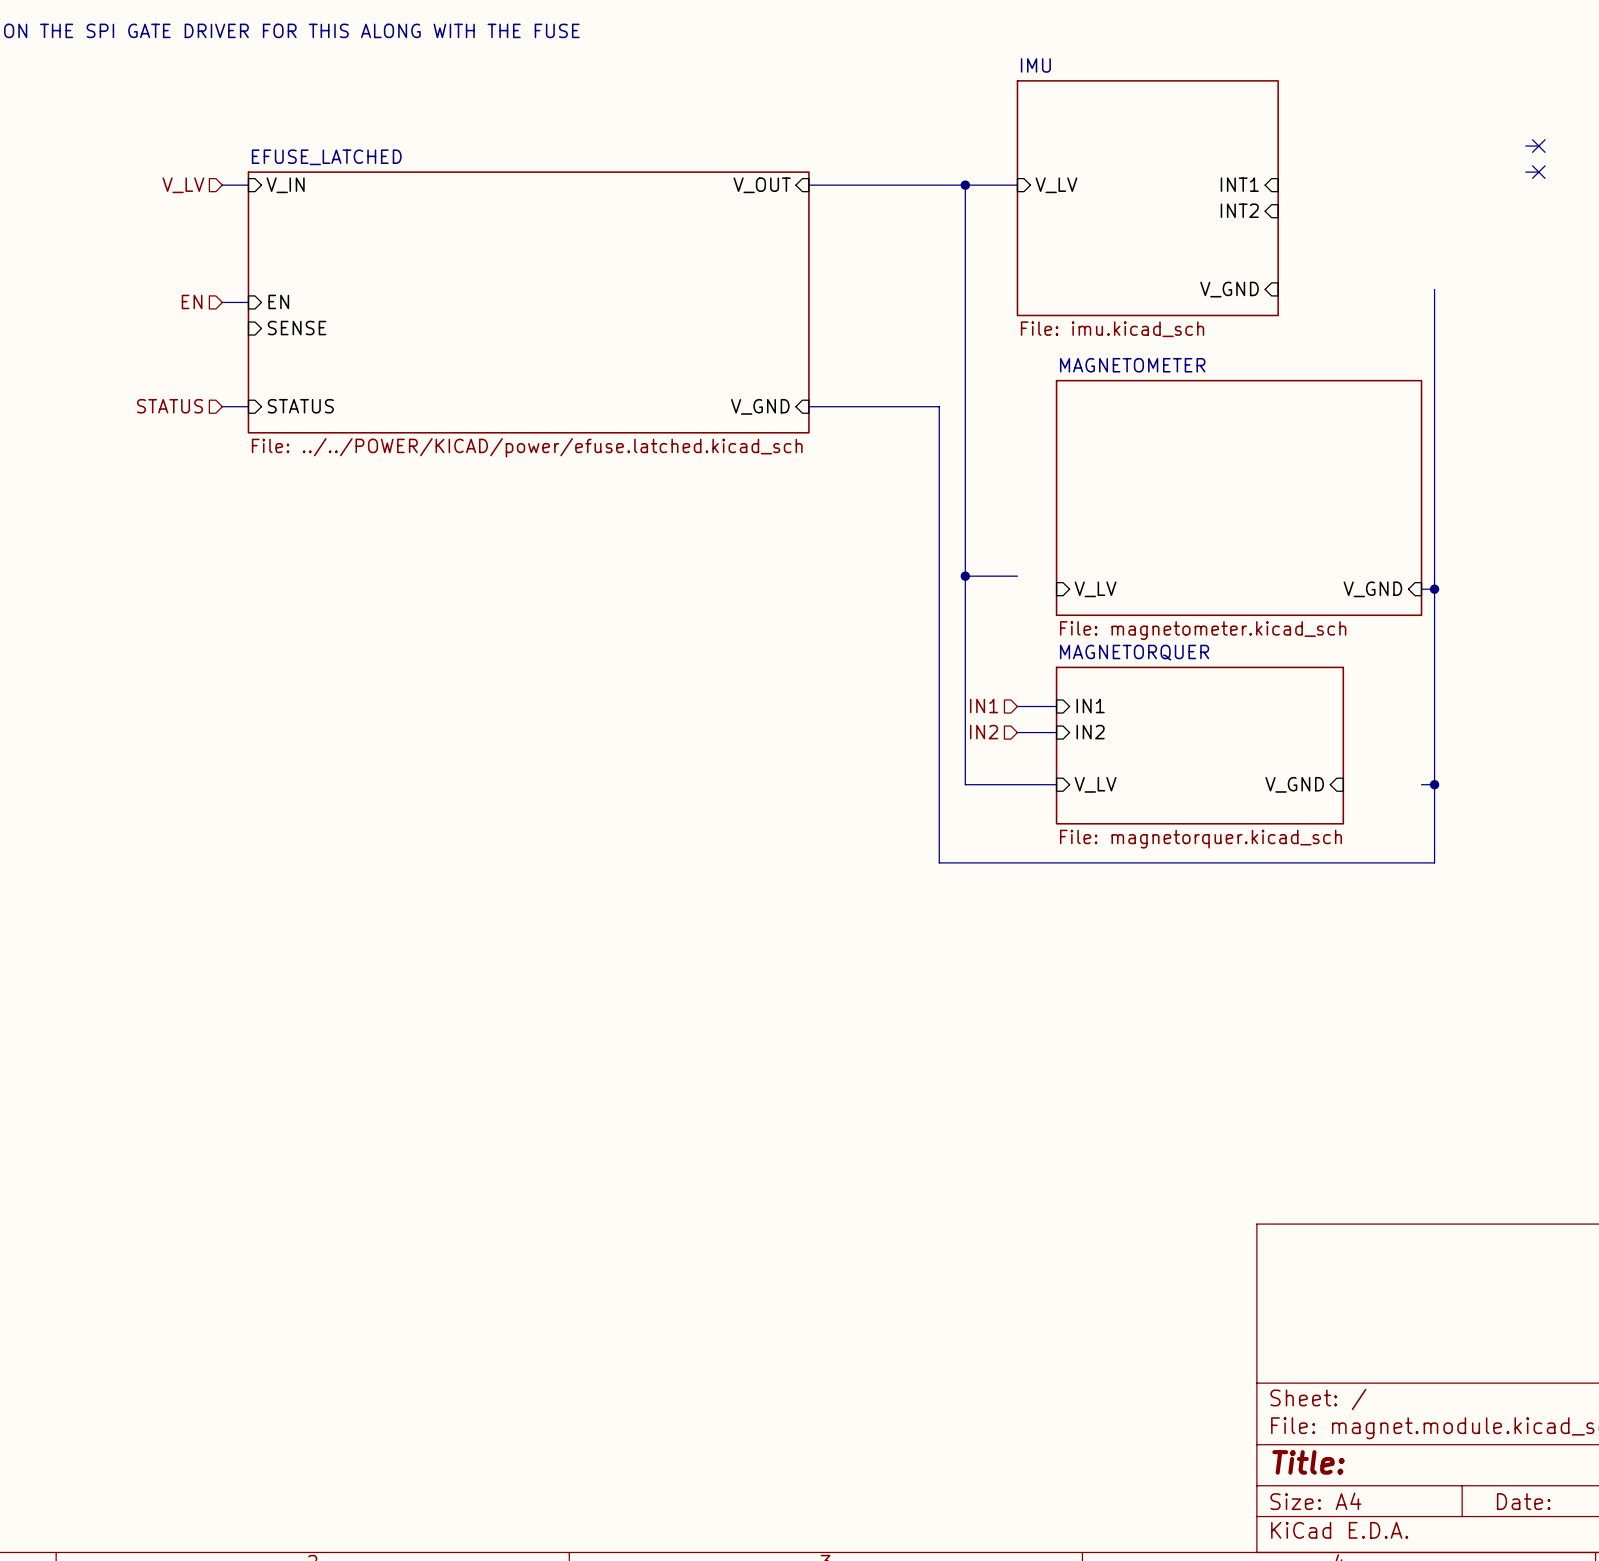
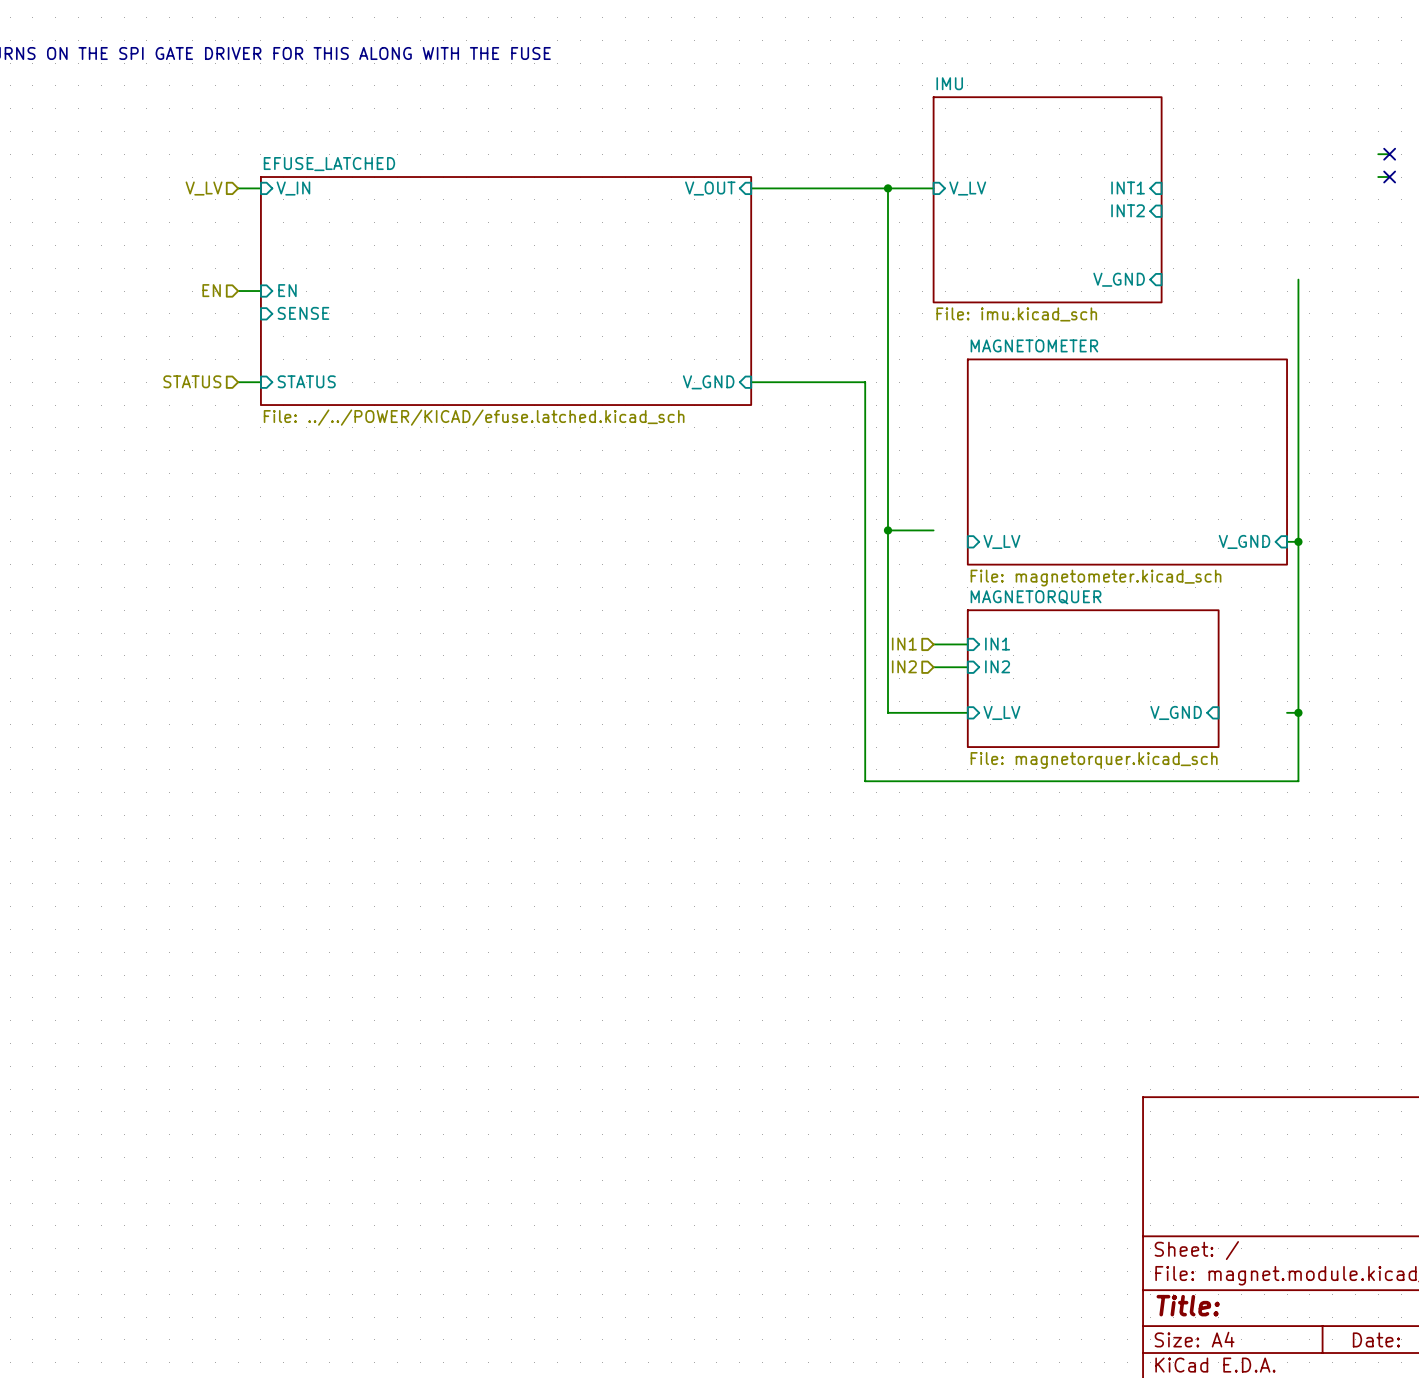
sheet EFUSE_LATCHED value: File: ../../POWER/KICAD/power/efuse.latched.kicad_sch (527, 447) -> File: ../../POWER/KICAD/efuse.latched.kicad_sch (474, 417)

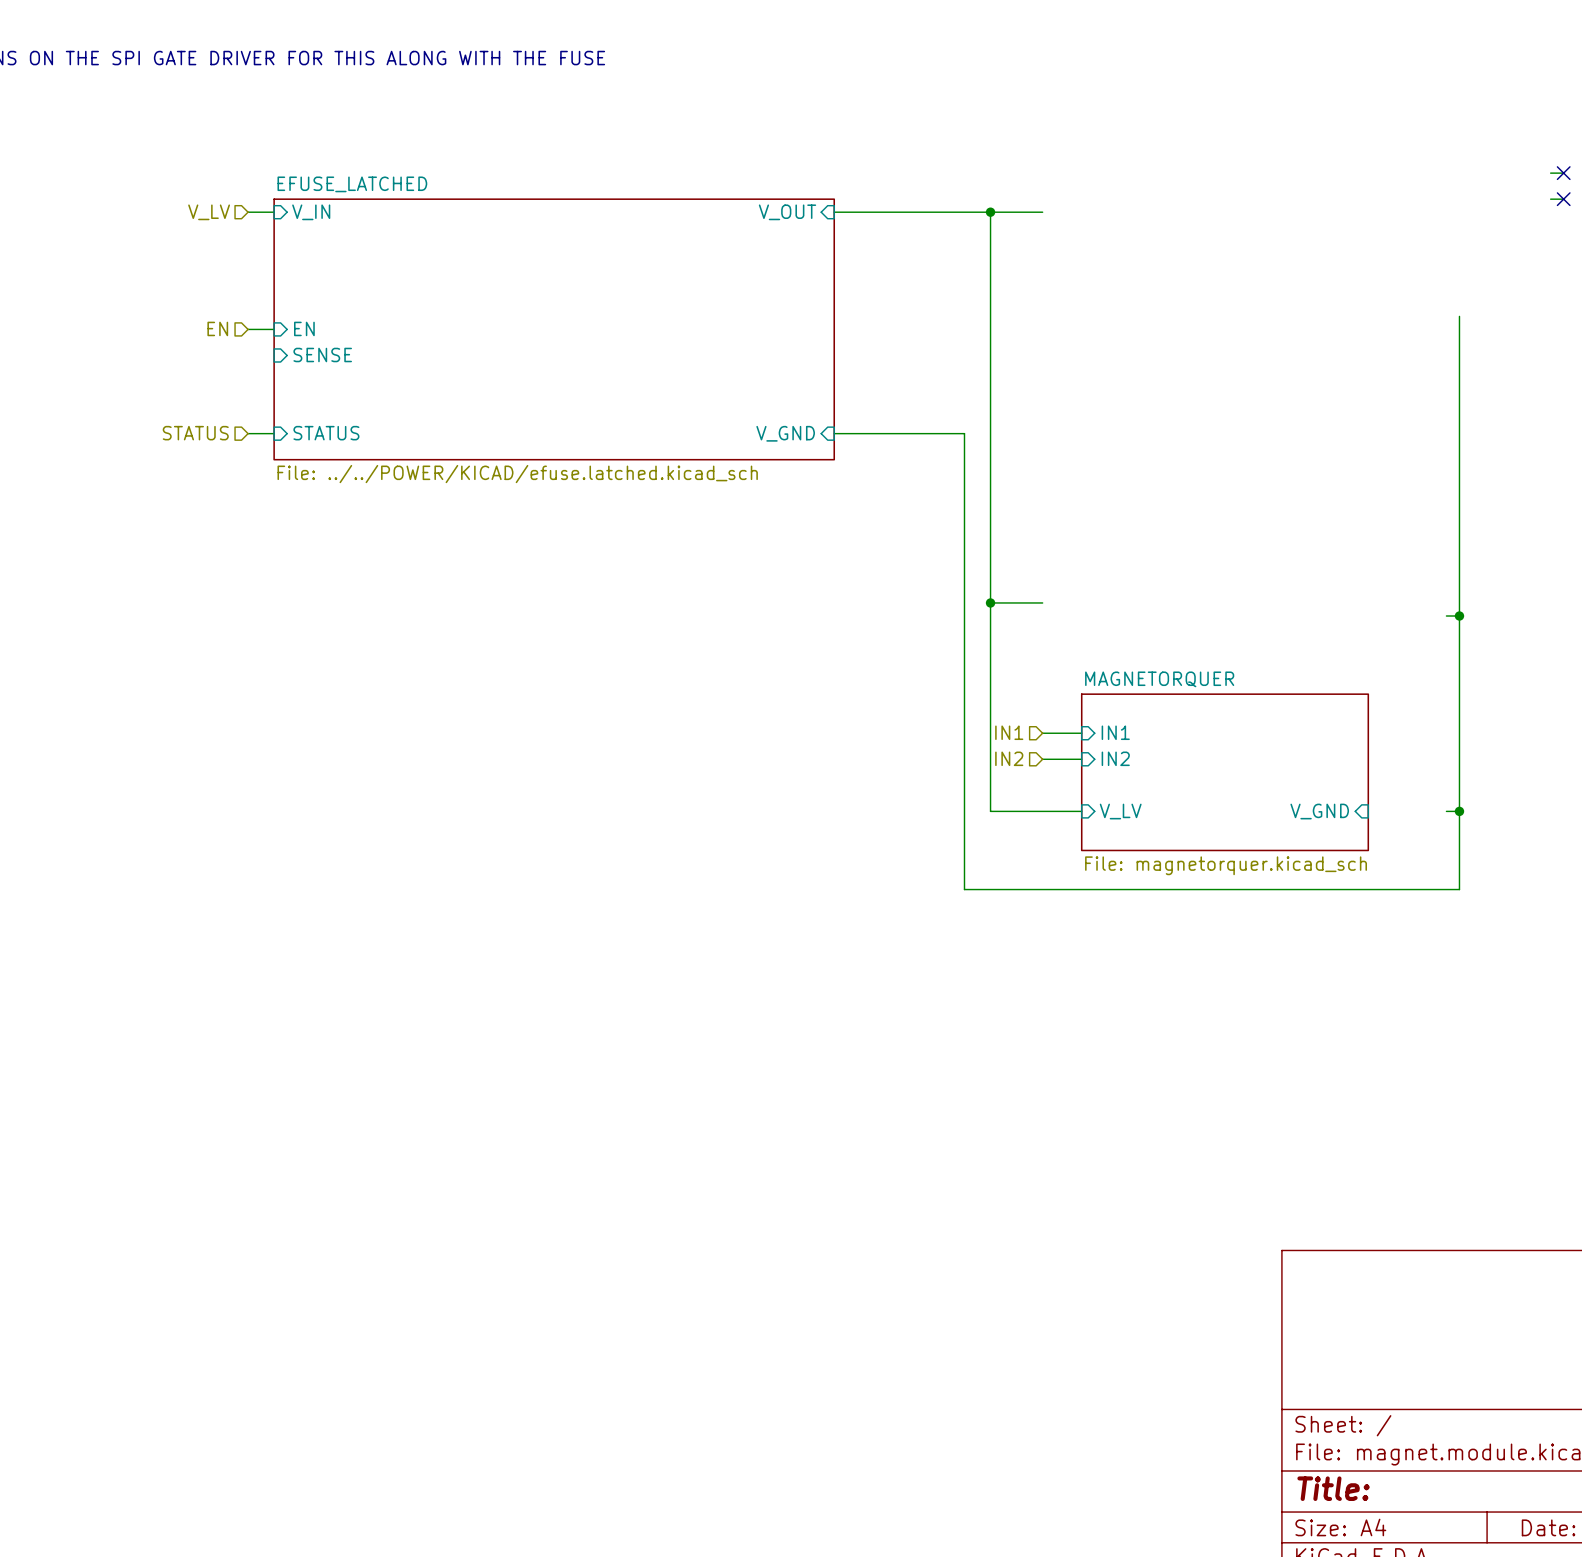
sheet pin: INT1 (1128, 187) -> none
sheet pin: V_LV (967, 188) -> none
sheet IMU: File: imu.kicad_sch (1047, 199) -> none
sheet pin: INT2 (1128, 210) -> none
sheet pin: V_GND (1119, 279) -> none
sheet MAGNETOMETER: File: magnetometer.kicad_sch (1127, 462) -> none
sheet pin: V_LV (1001, 541) -> none
sheet pin: V_GND (1244, 541) -> none

